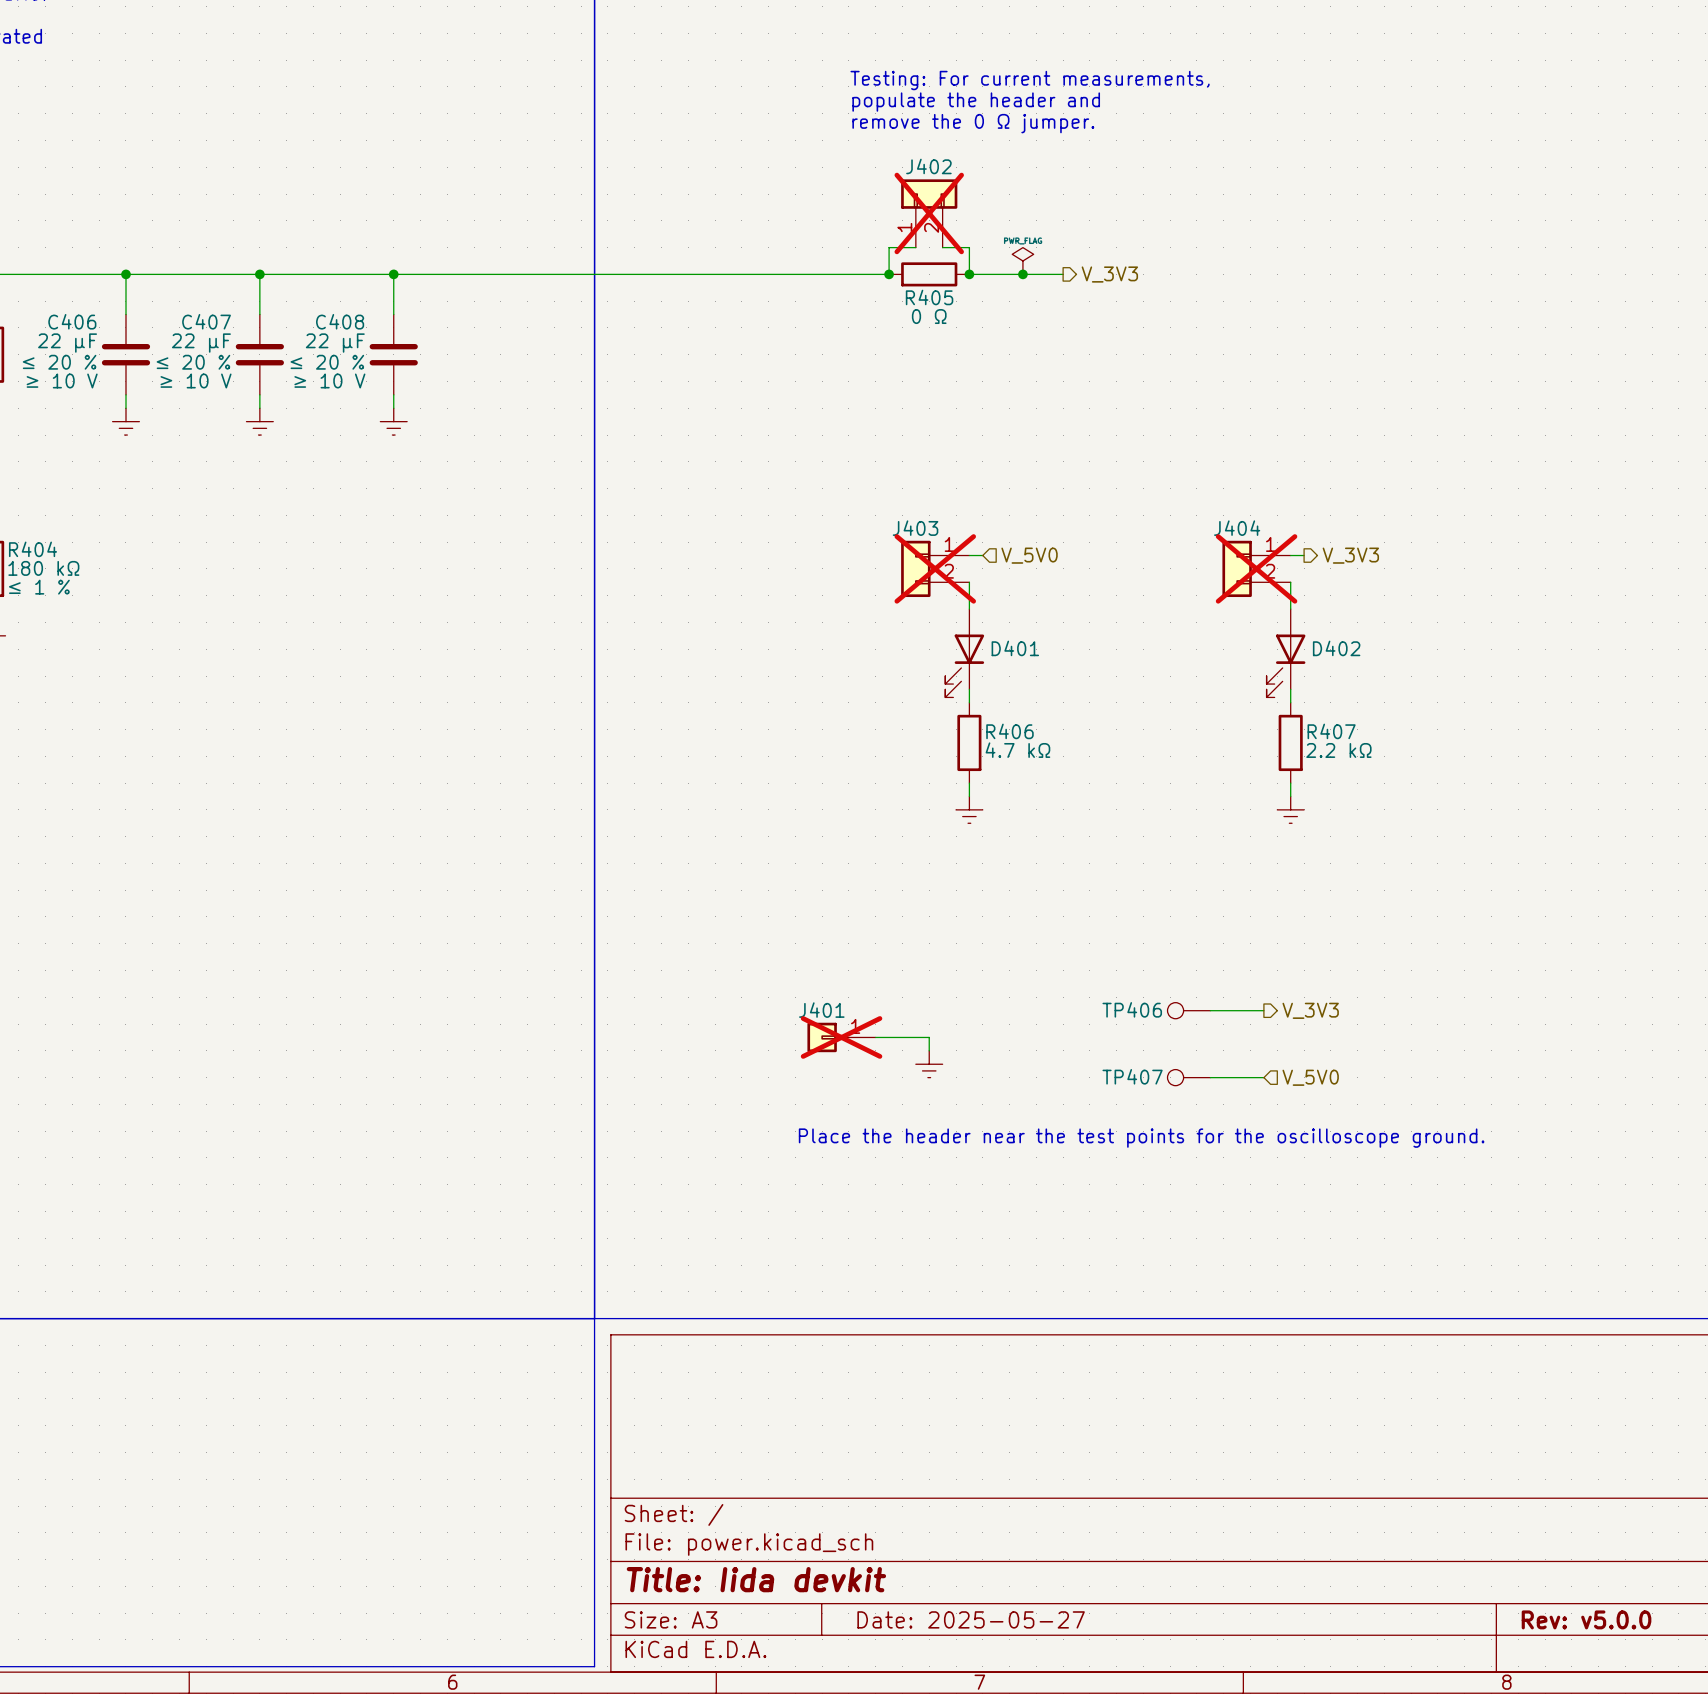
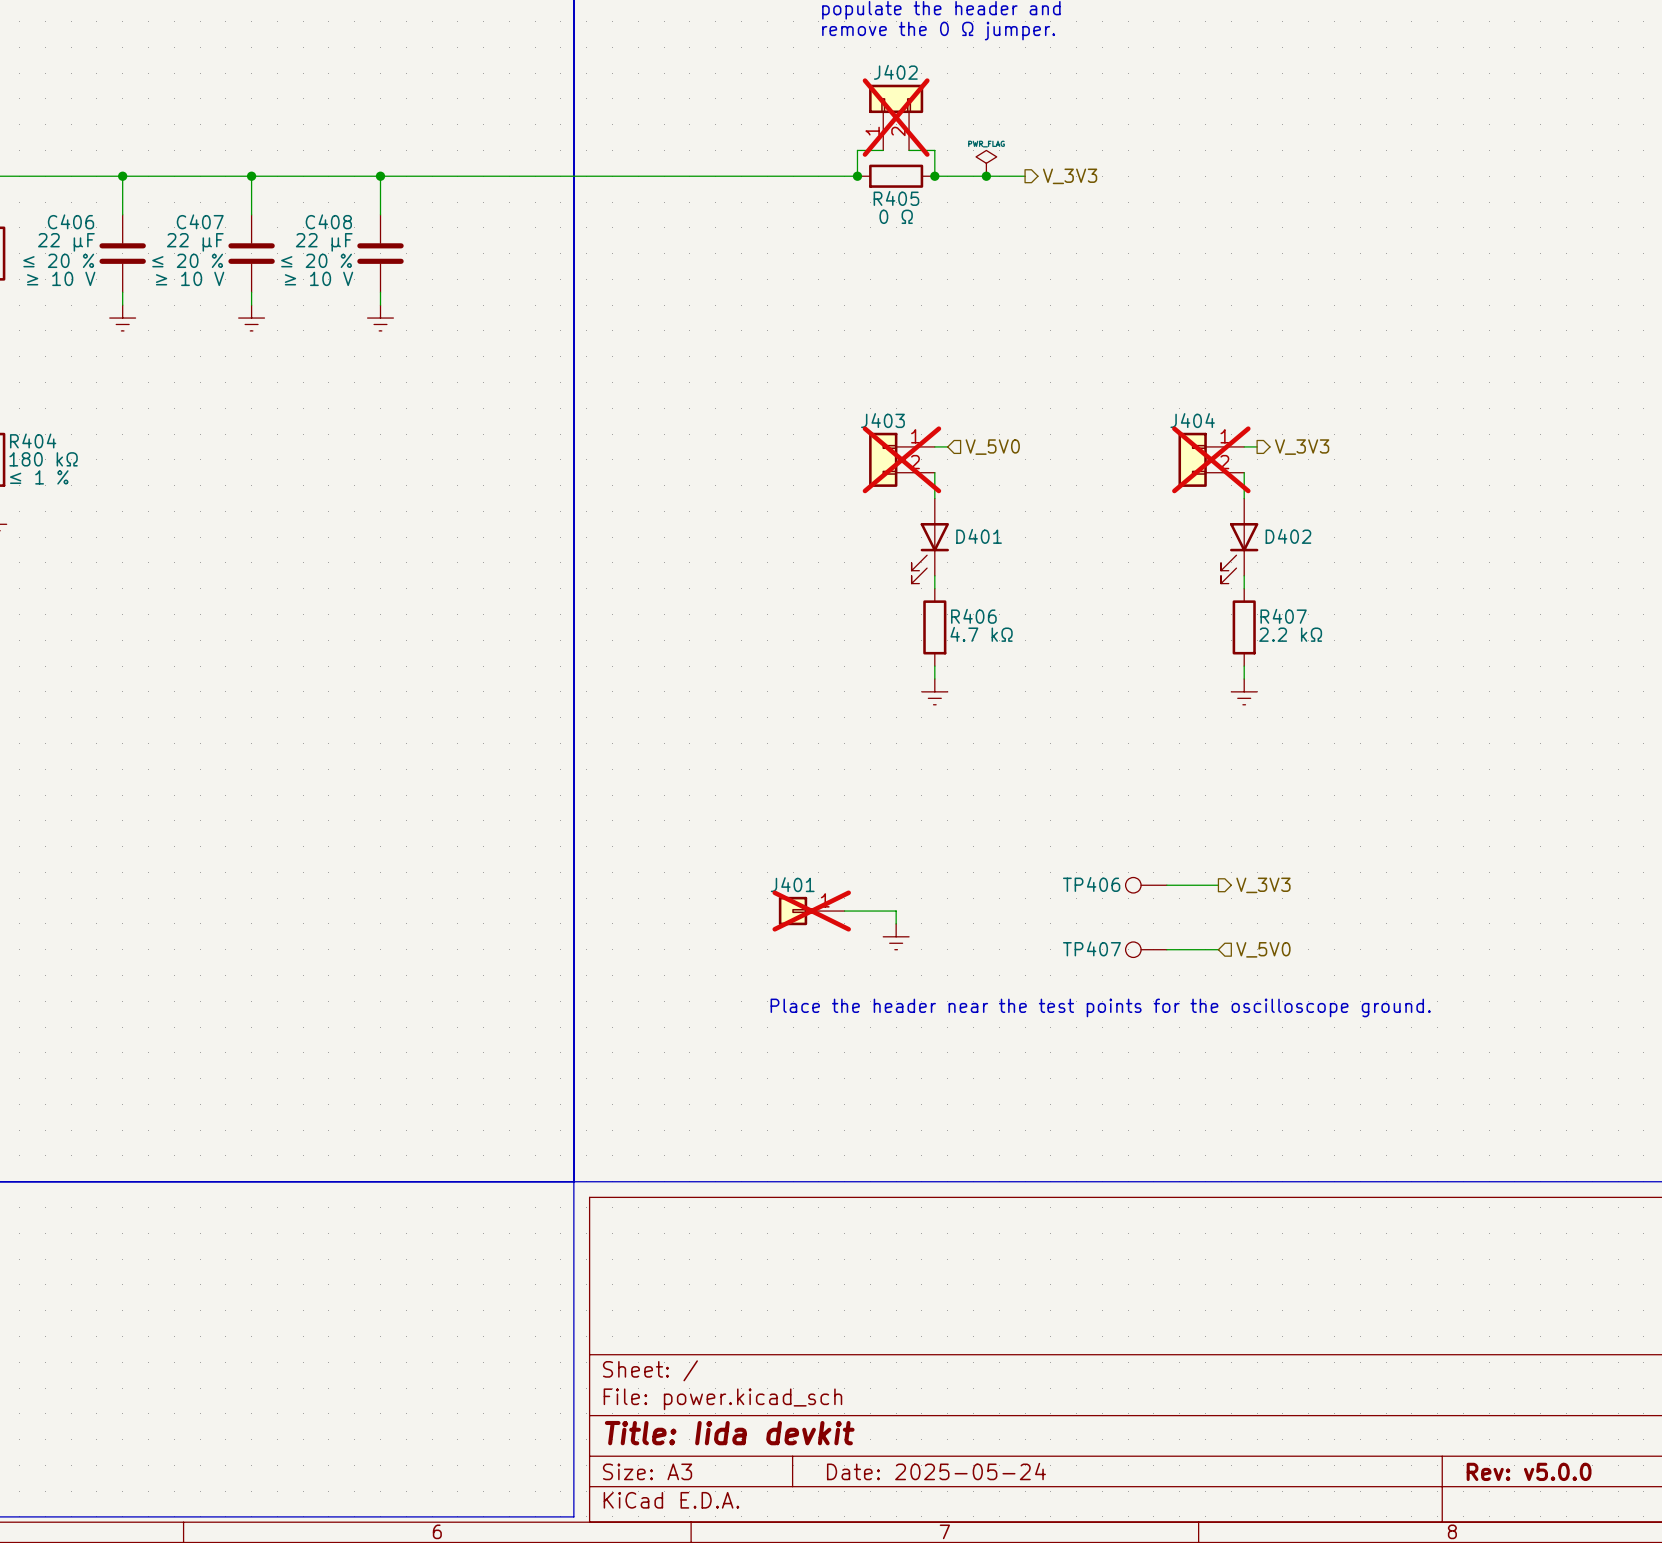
title block: Date: 2025-05-27 (971, 1619) -> Date: 2025-05-24 (936, 1471)

